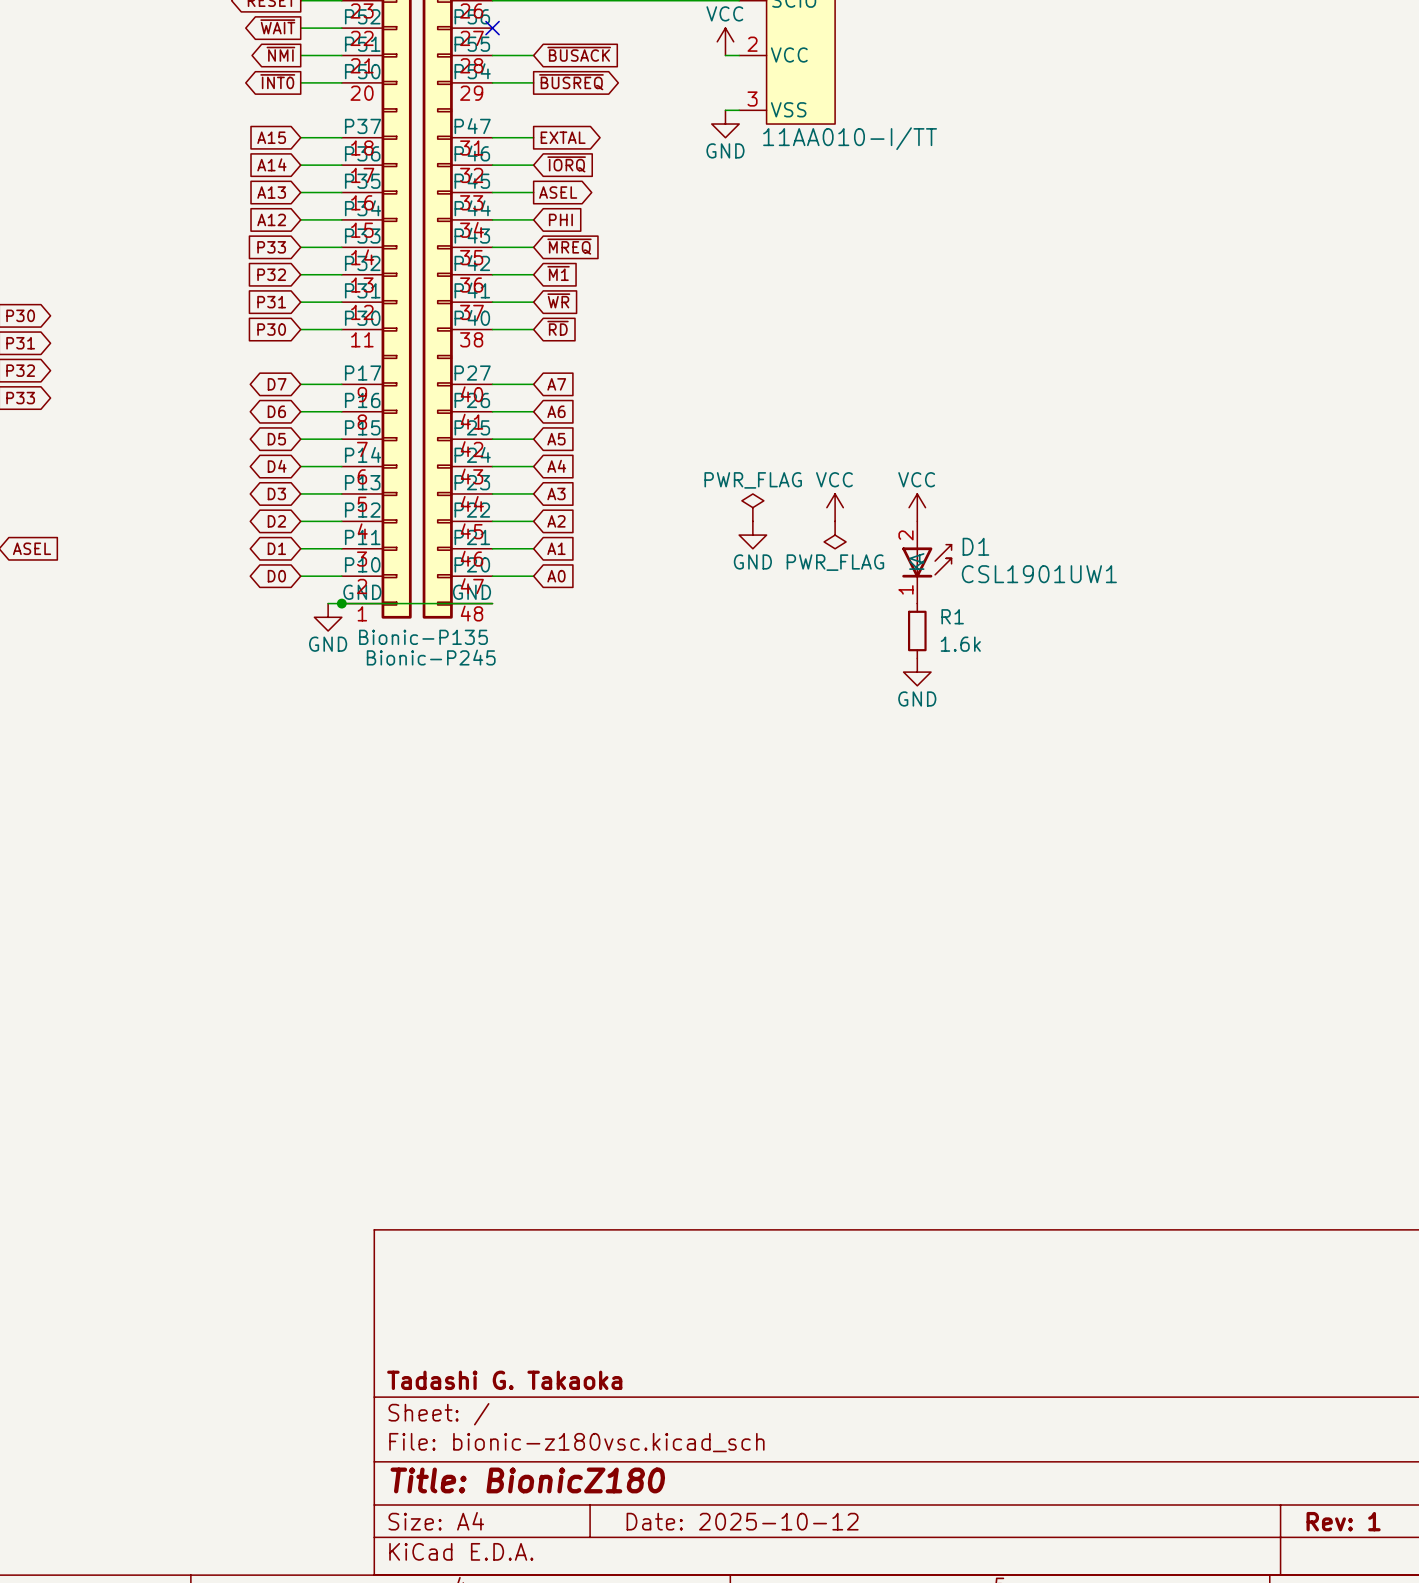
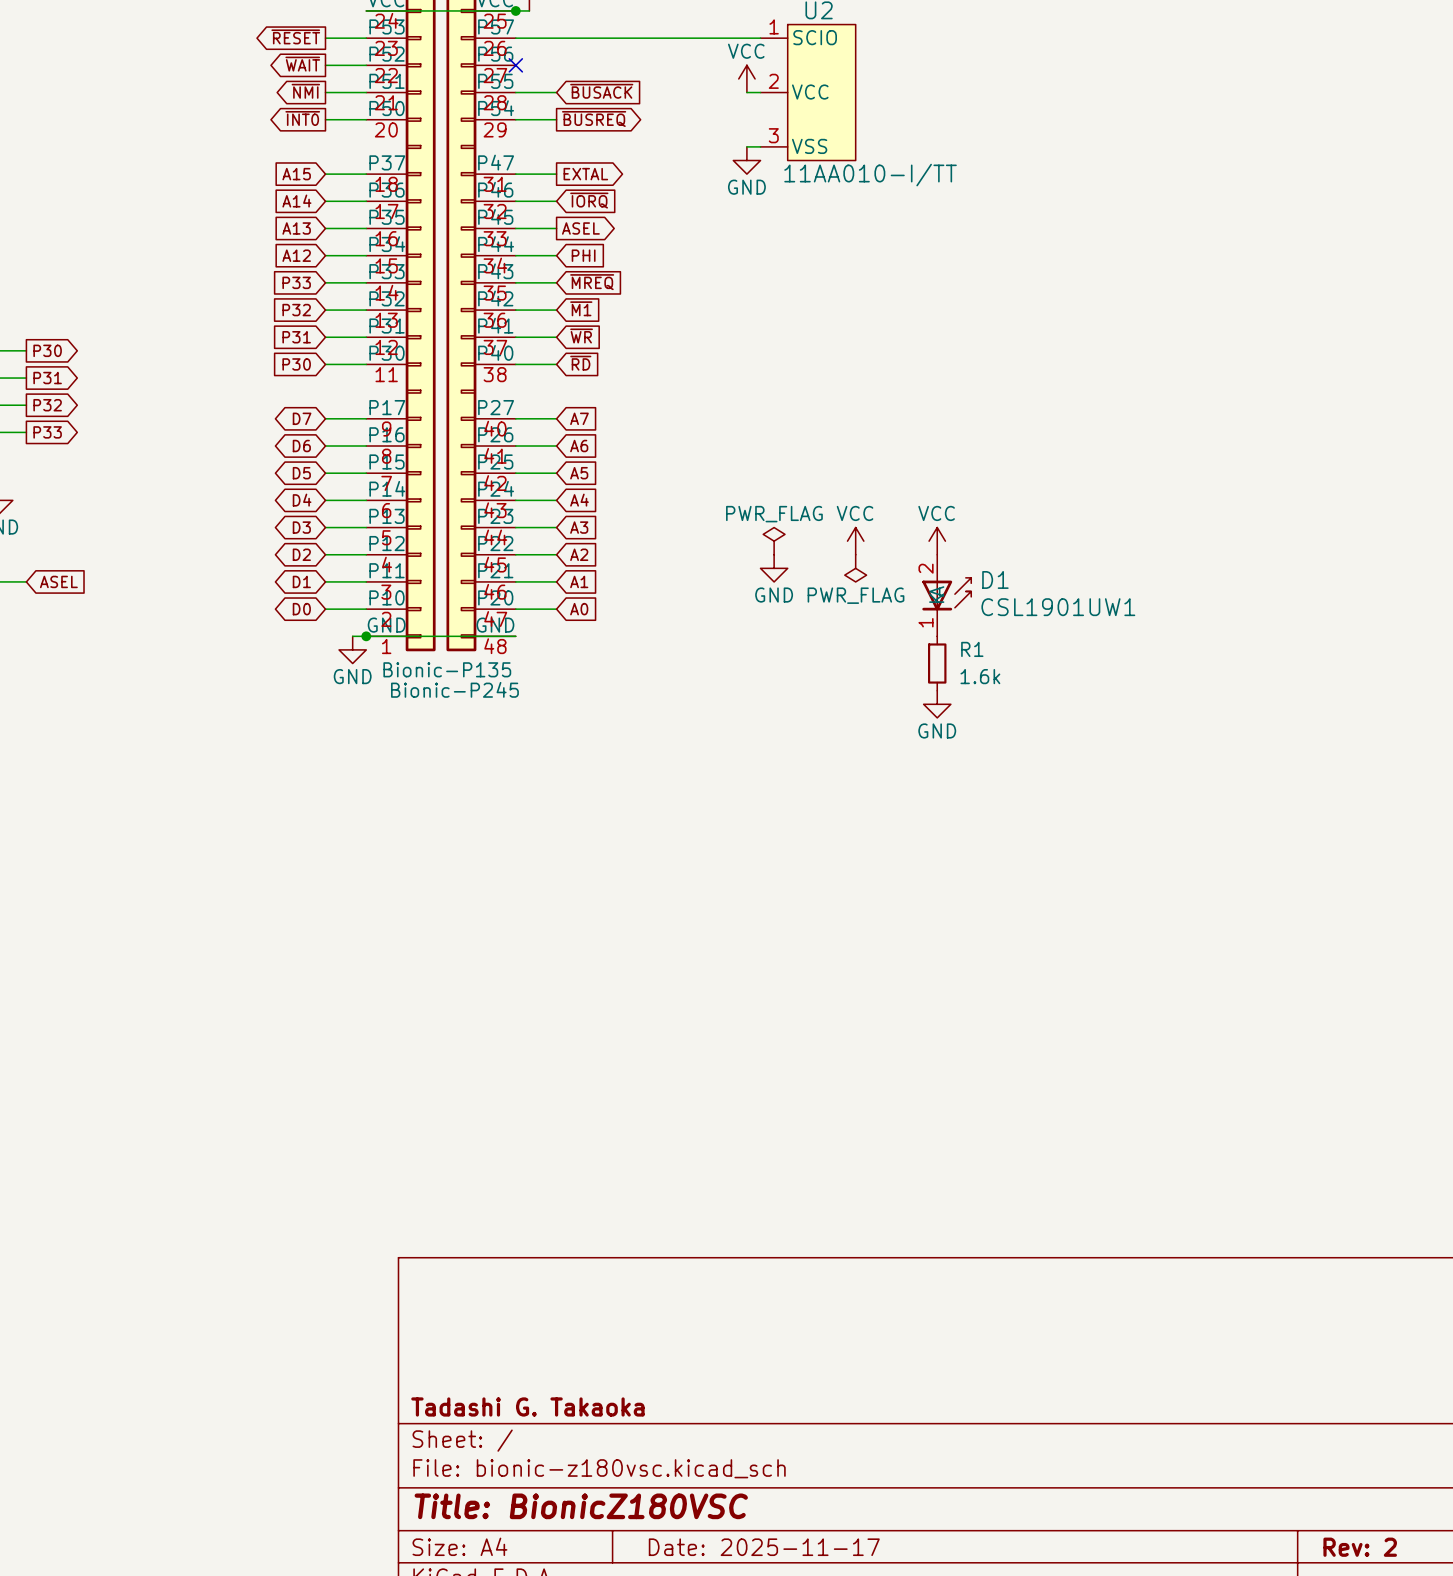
title block: Title: BionicZ180 (527, 1480) -> Title: BionicZ180VSC (581, 1506)
title block: Date: 2025-10-12 (742, 1521) -> Date: 2025-11-17 (764, 1547)
title block: Rev: 1 (1343, 1521) -> Rev: 2 (1360, 1547)

